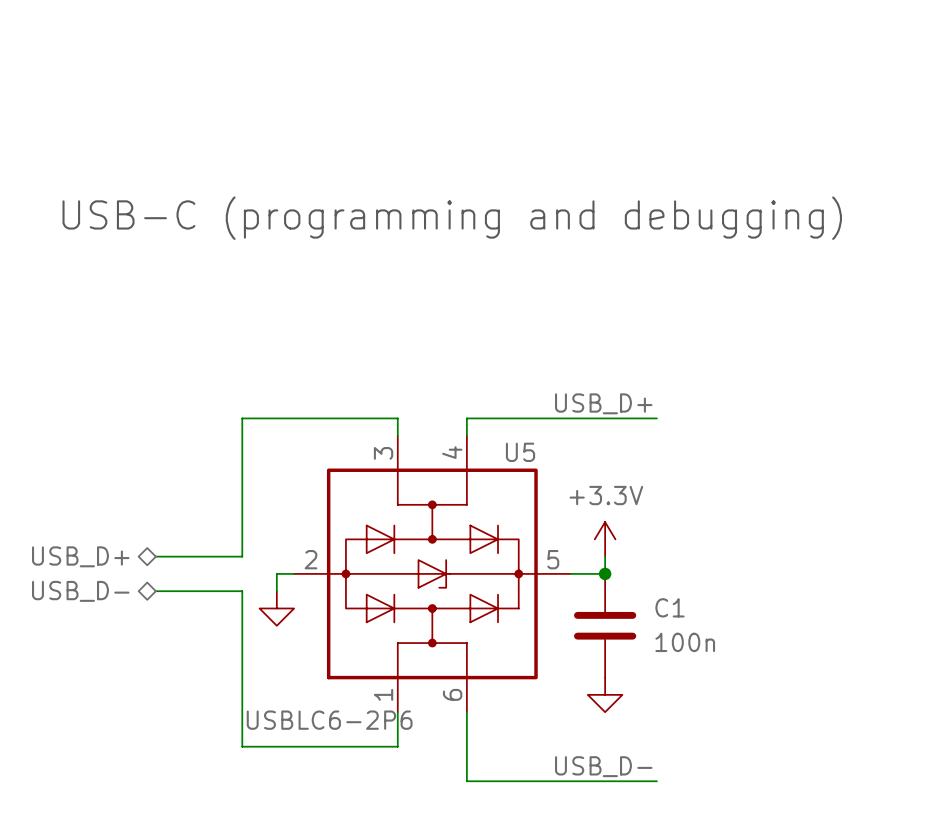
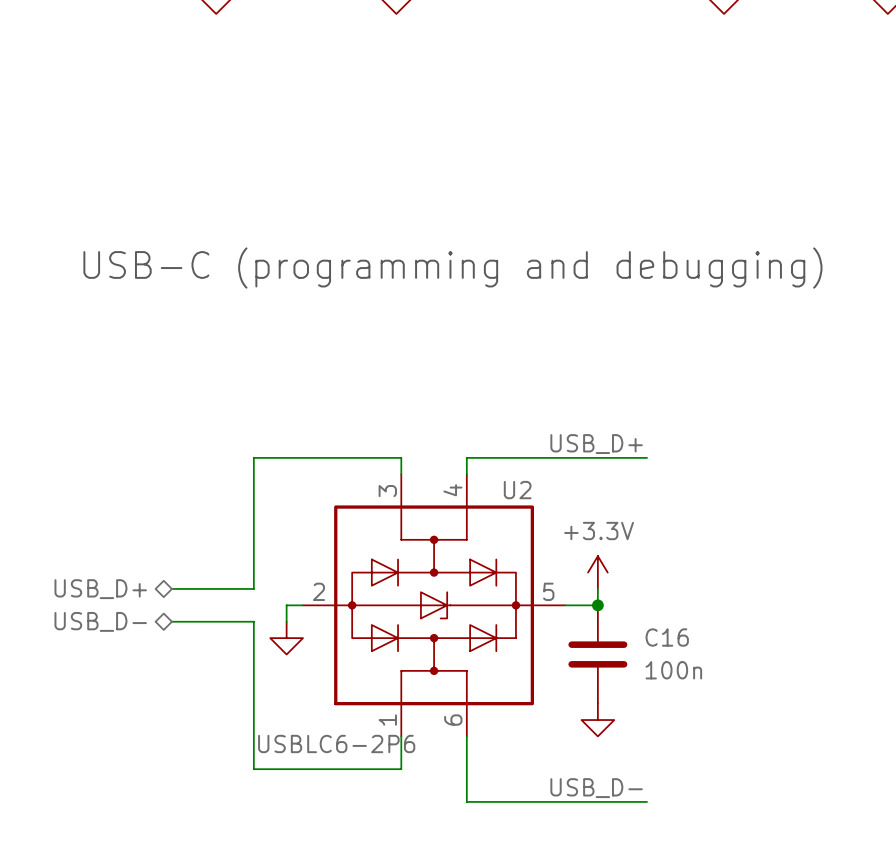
U5 name: U5 (520, 452) -> U2 (517, 490)
C1 name: C1 (670, 607) -> C16 (667, 637)

